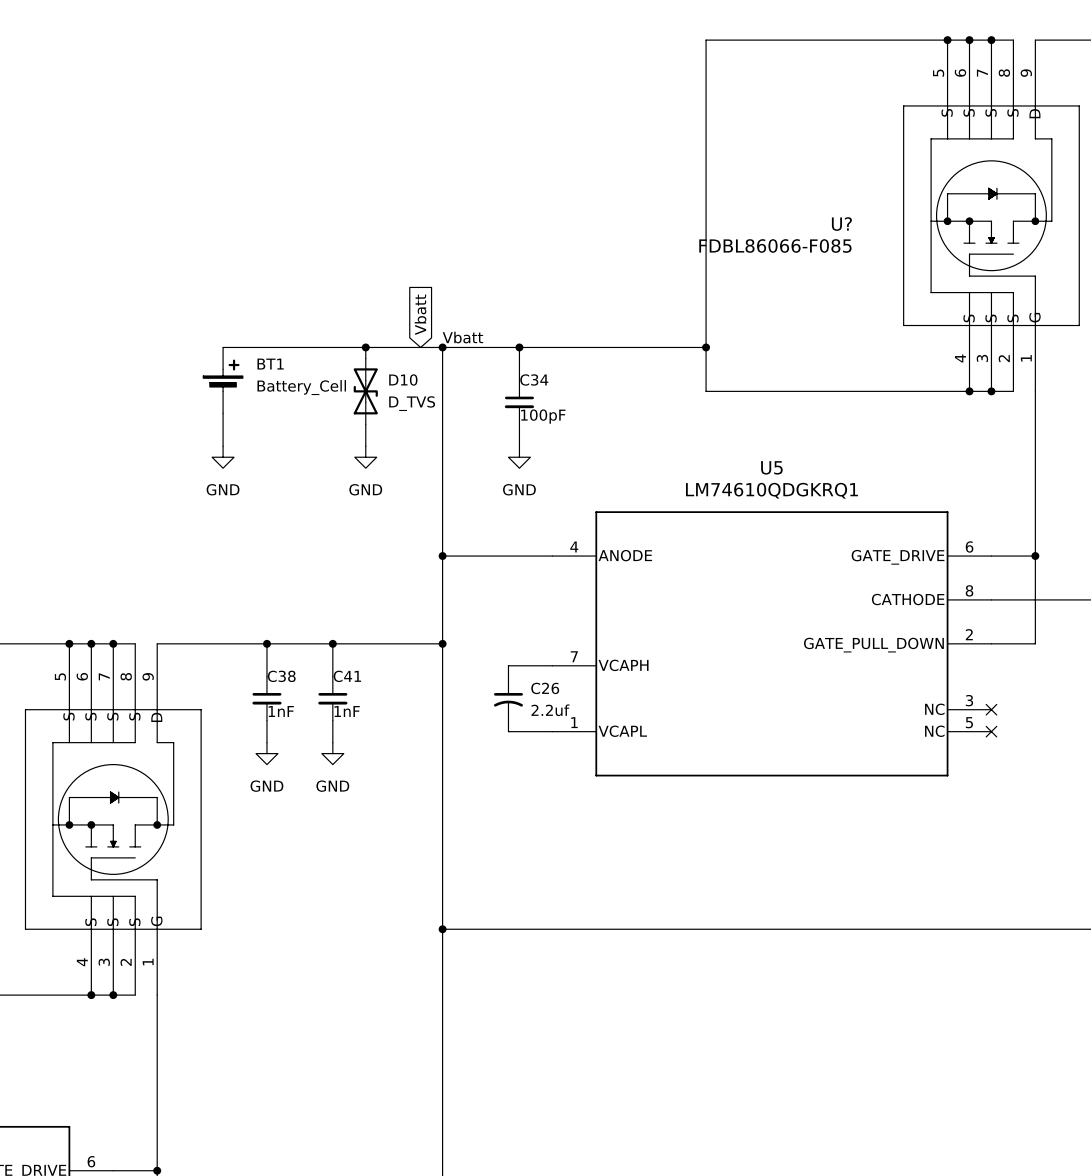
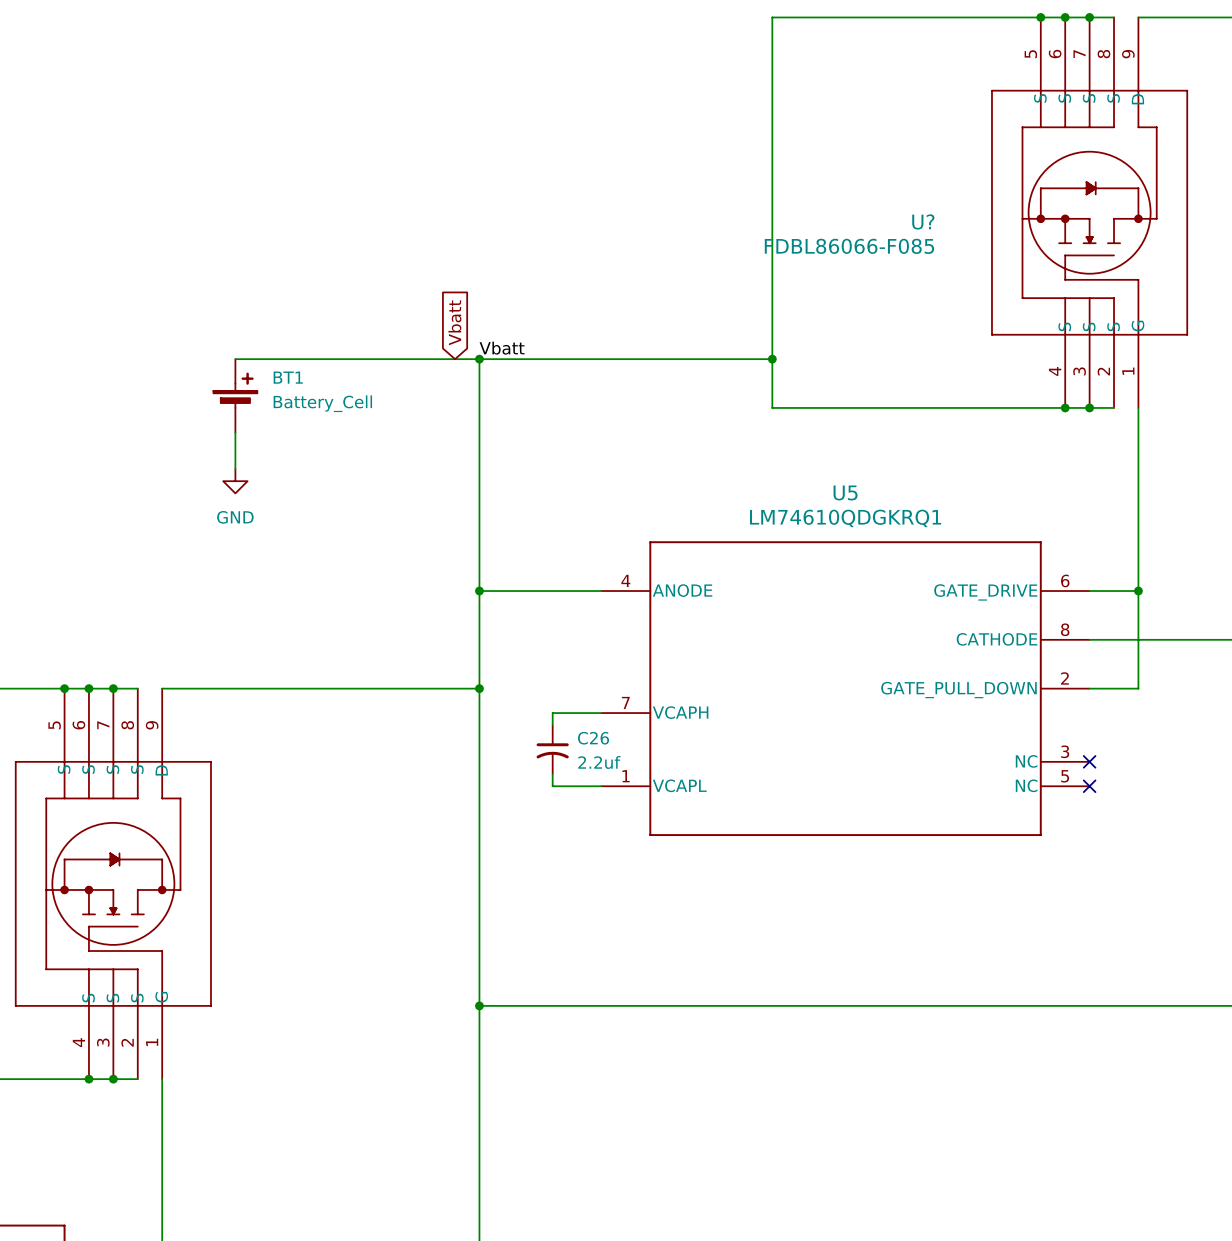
wire: (365, 347) (365, 358) -> none
junction: (365, 347) -> none
wire: (519, 347) (519, 380) -> none
junction: (519, 347) -> none
D10: D_TVS (365, 391) -> none
C34: 100pF (519, 402) -> none
wire: (365, 424) (365, 446) -> none
wire: (519, 424) (519, 446) -> none
power symbol: GND (365, 457) -> none
power symbol: GND (519, 457) -> none
wire: (266, 643) (266, 676) -> none
junction: (266, 643) -> none
wire: (332, 643) (332, 676) -> none
junction: (332, 643) -> none
C38: 1nF (266, 698) -> none
C41: 1nF (332, 698) -> none
wire: (266, 720) (266, 742) -> none
wire: (332, 720) (332, 742) -> none
power symbol: GND (266, 753) -> none
power symbol: GND (332, 753) -> none

